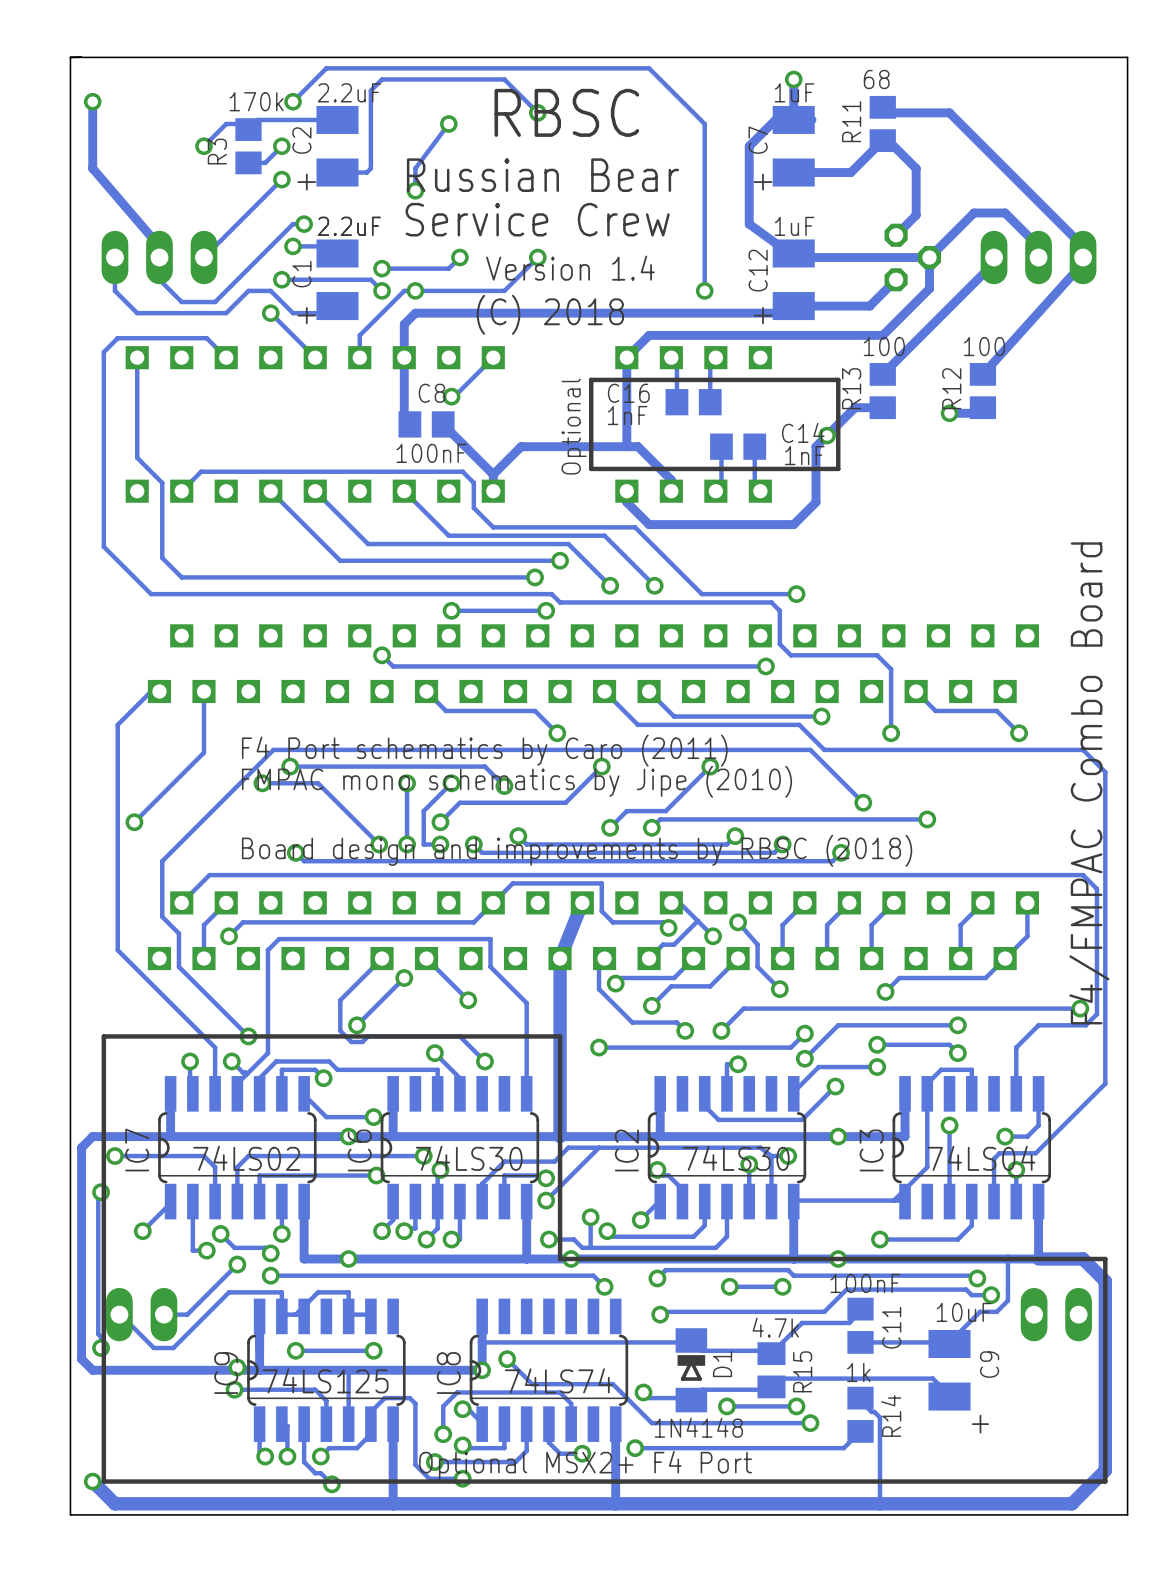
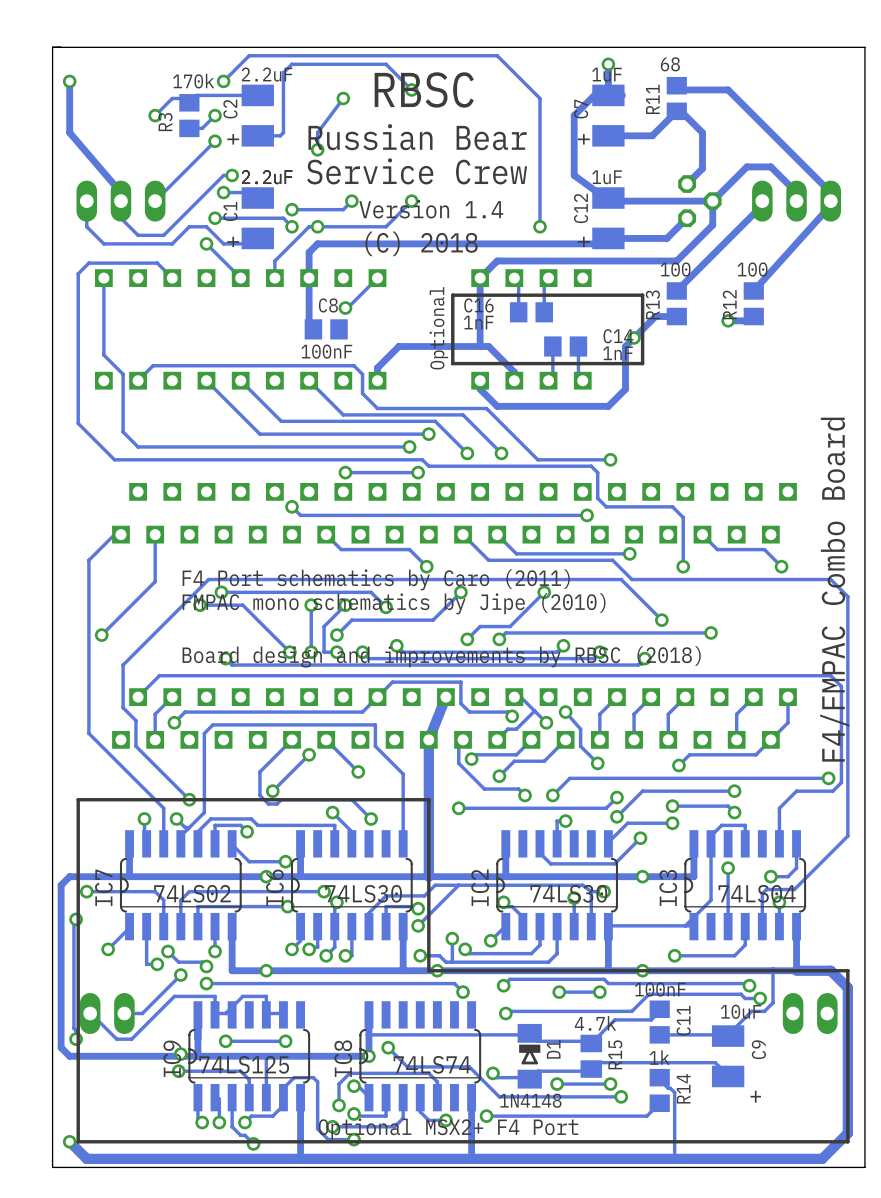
track: (443, 424) (493, 474) -> none

